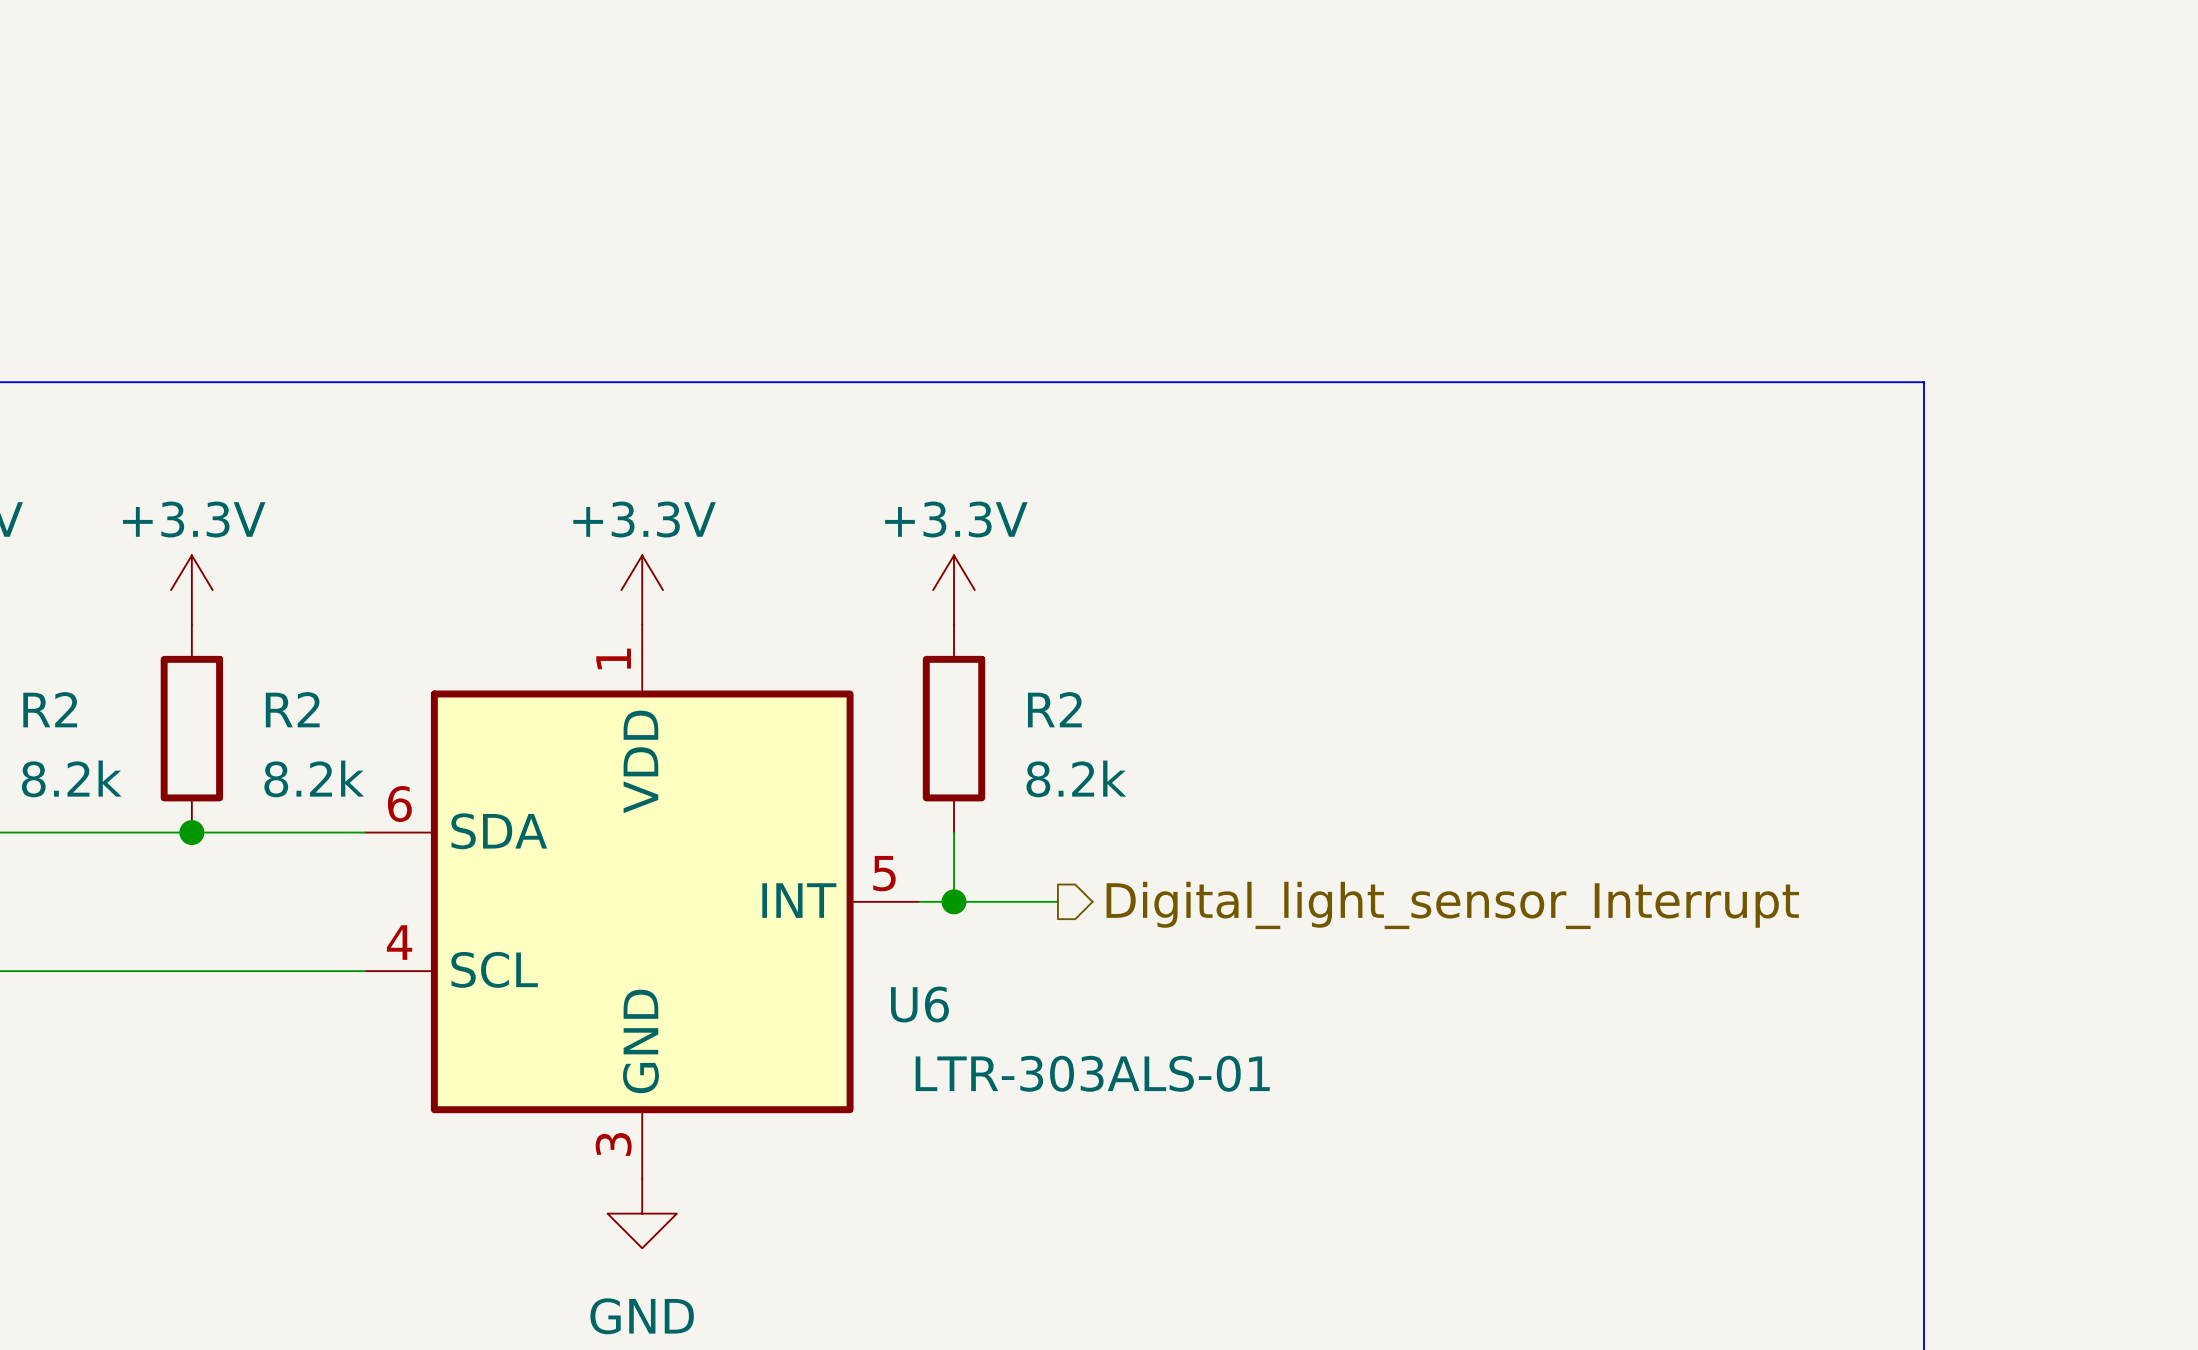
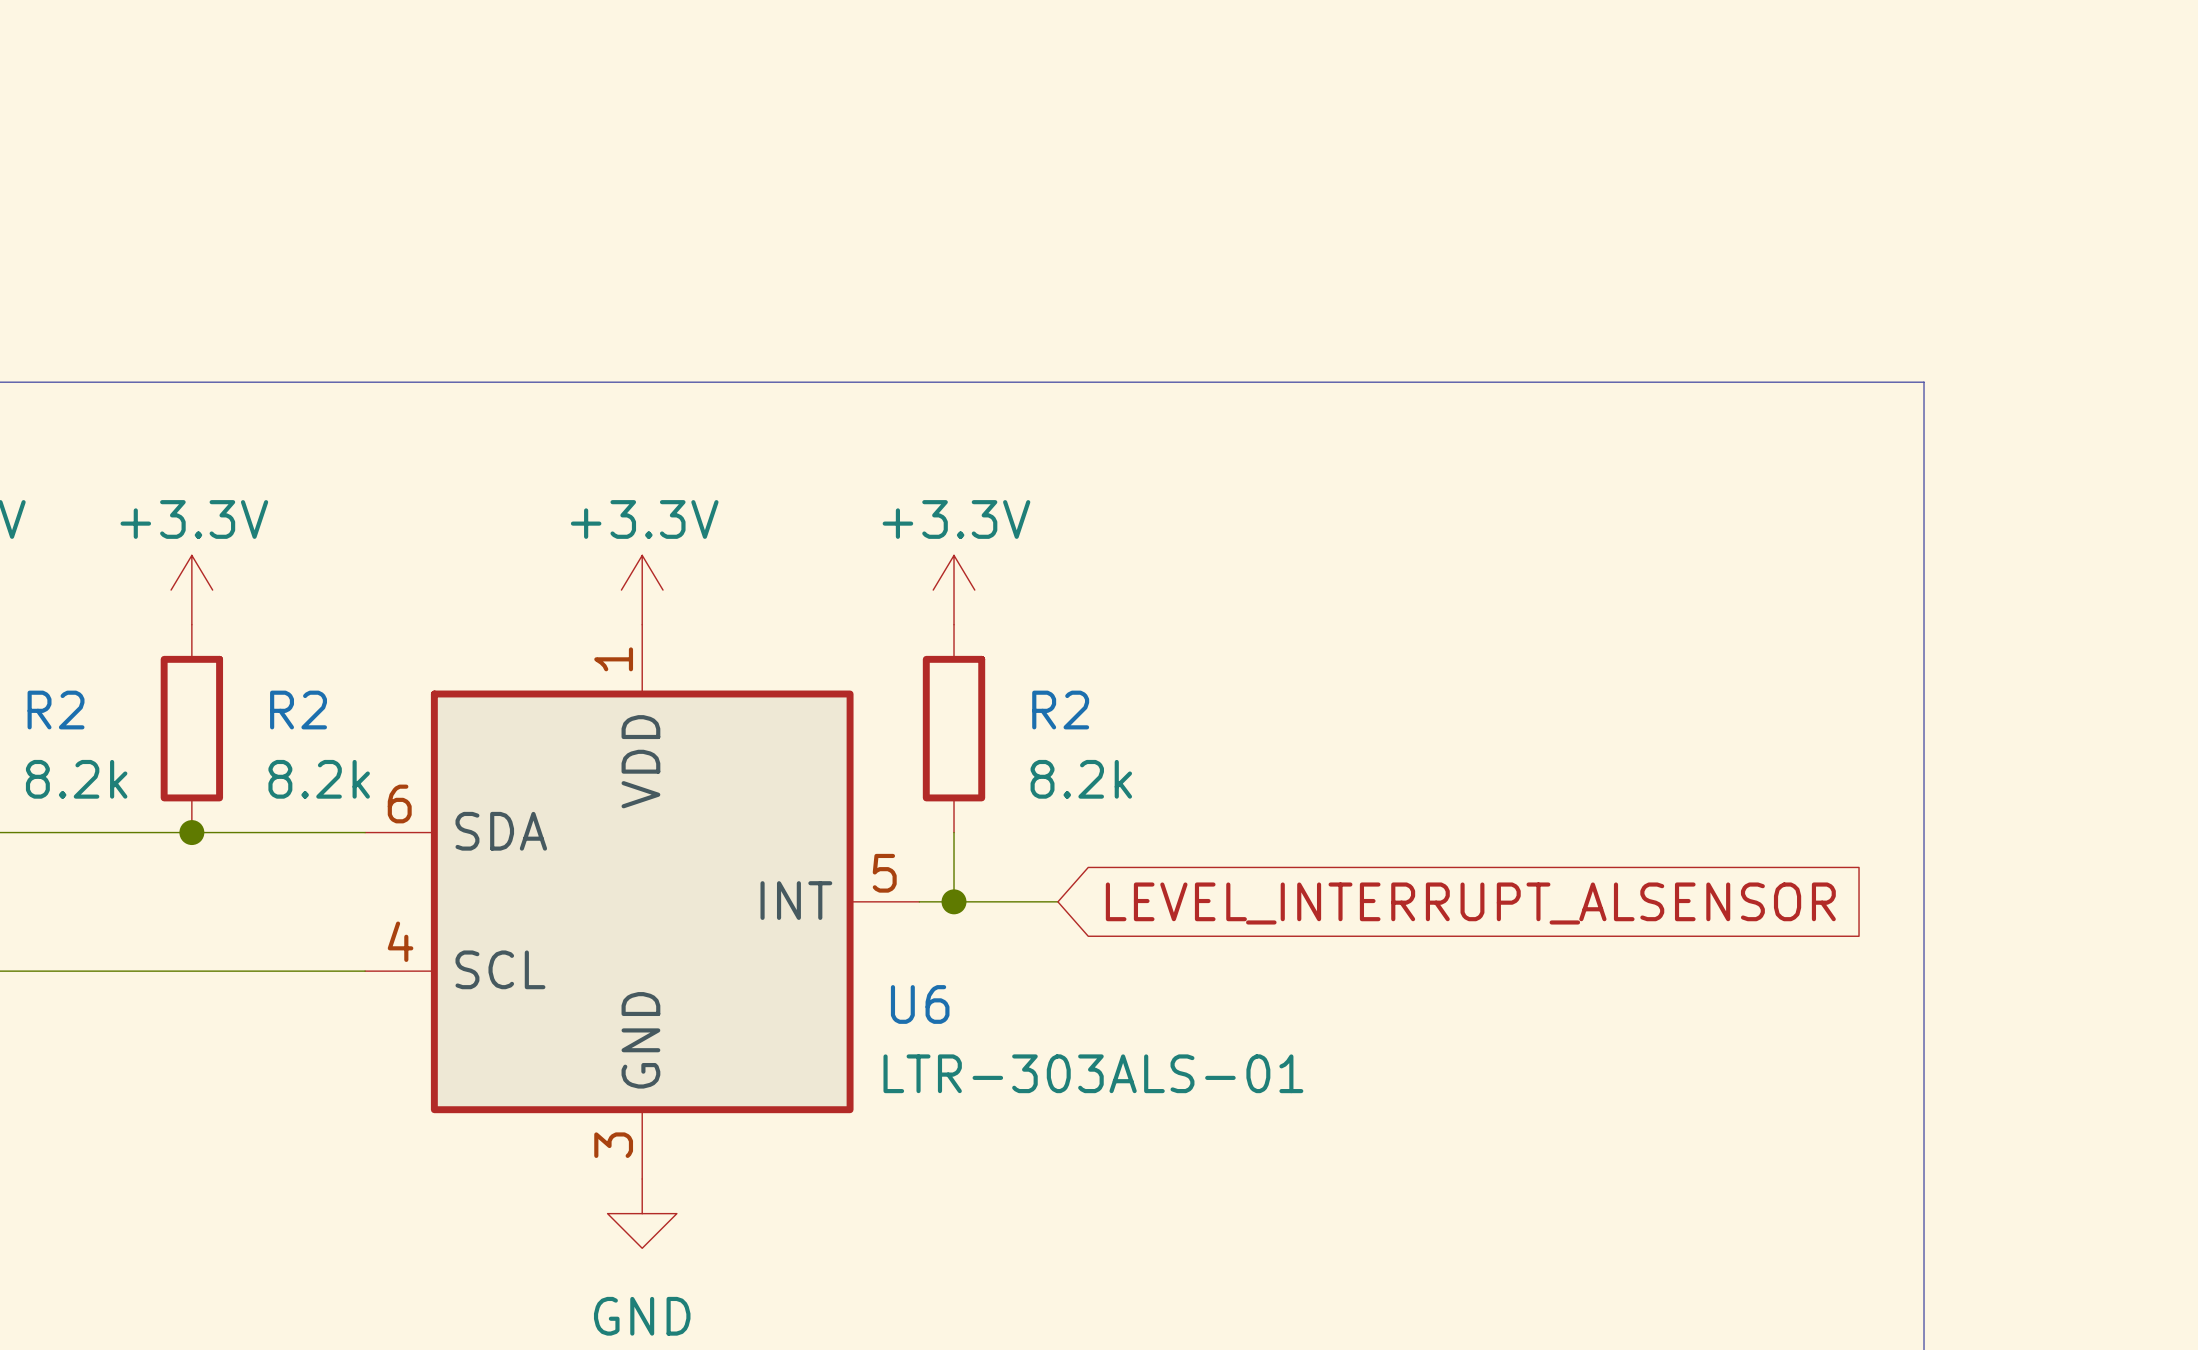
hierarchical label: Digital_light_sensor_Interrupt (1452, 905) -> none
global label: none -> LEVEL_INTERRUPT_ALSENSOR (1470, 903)

